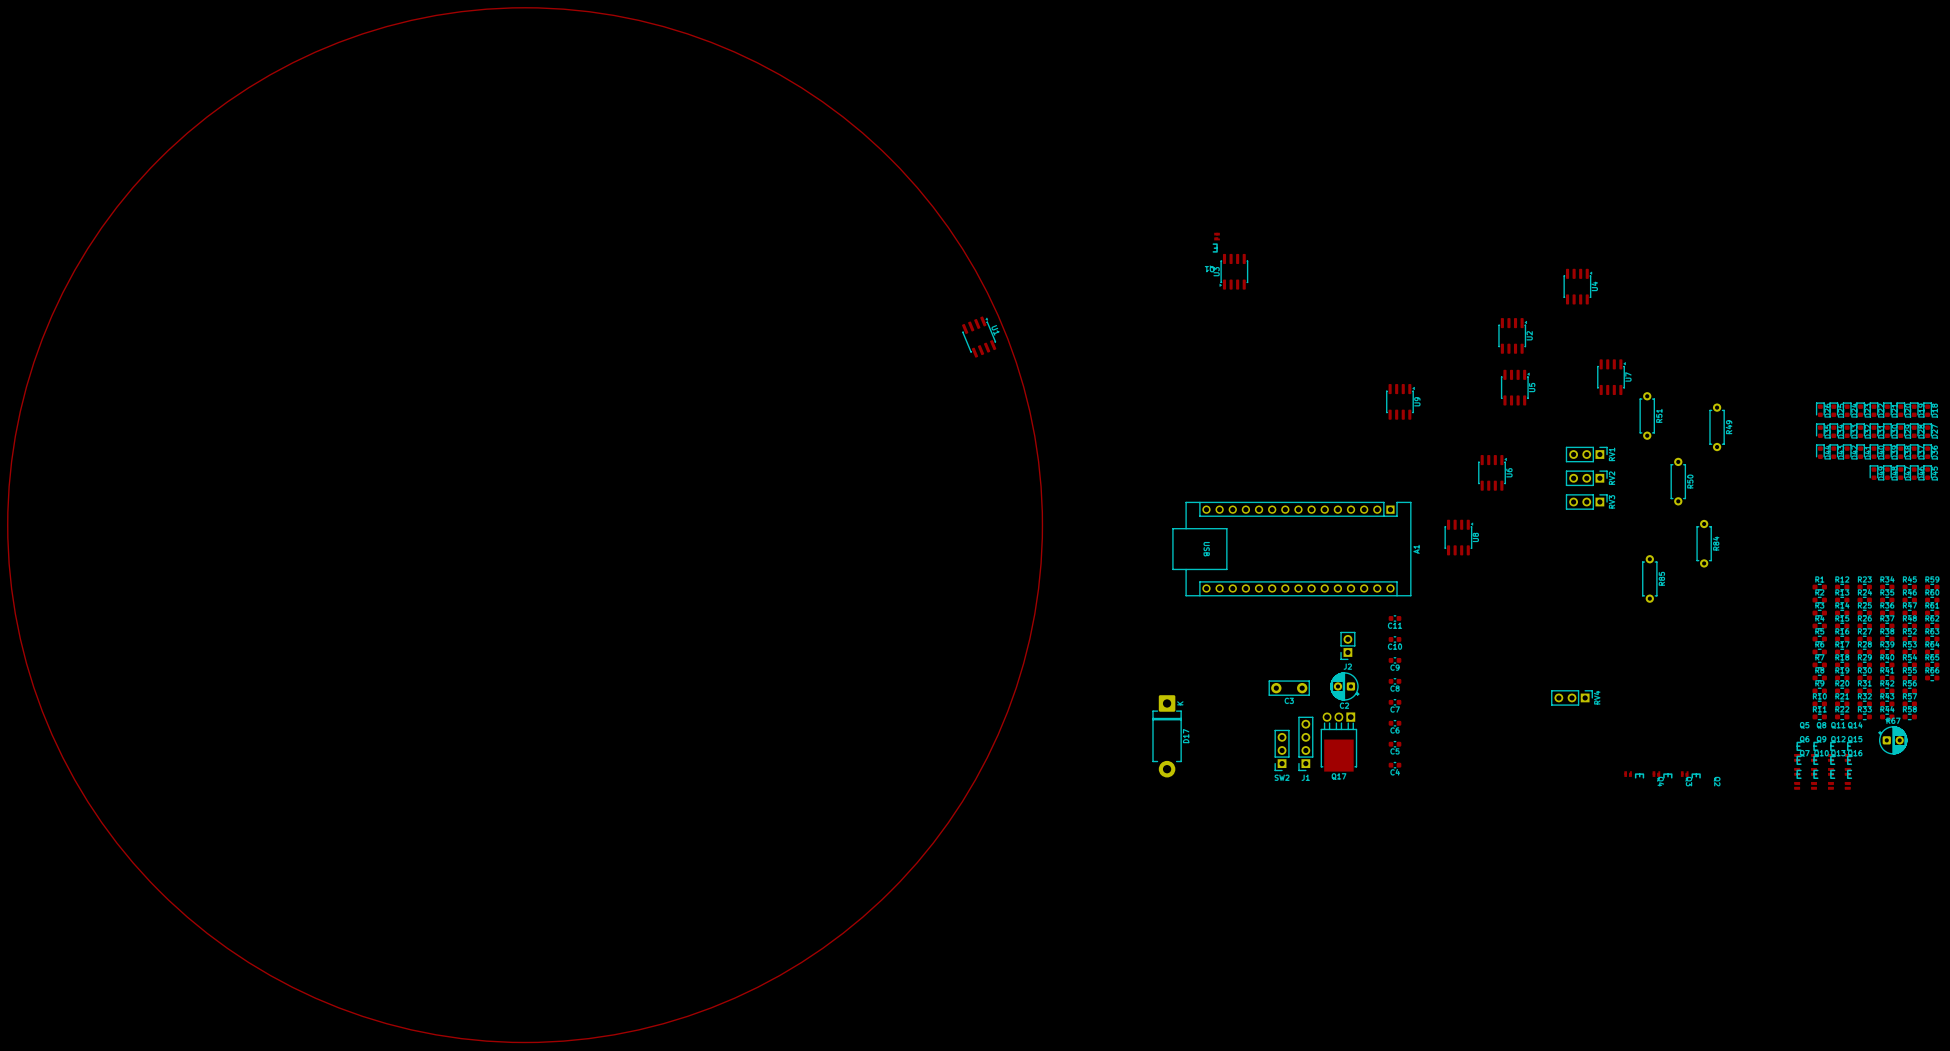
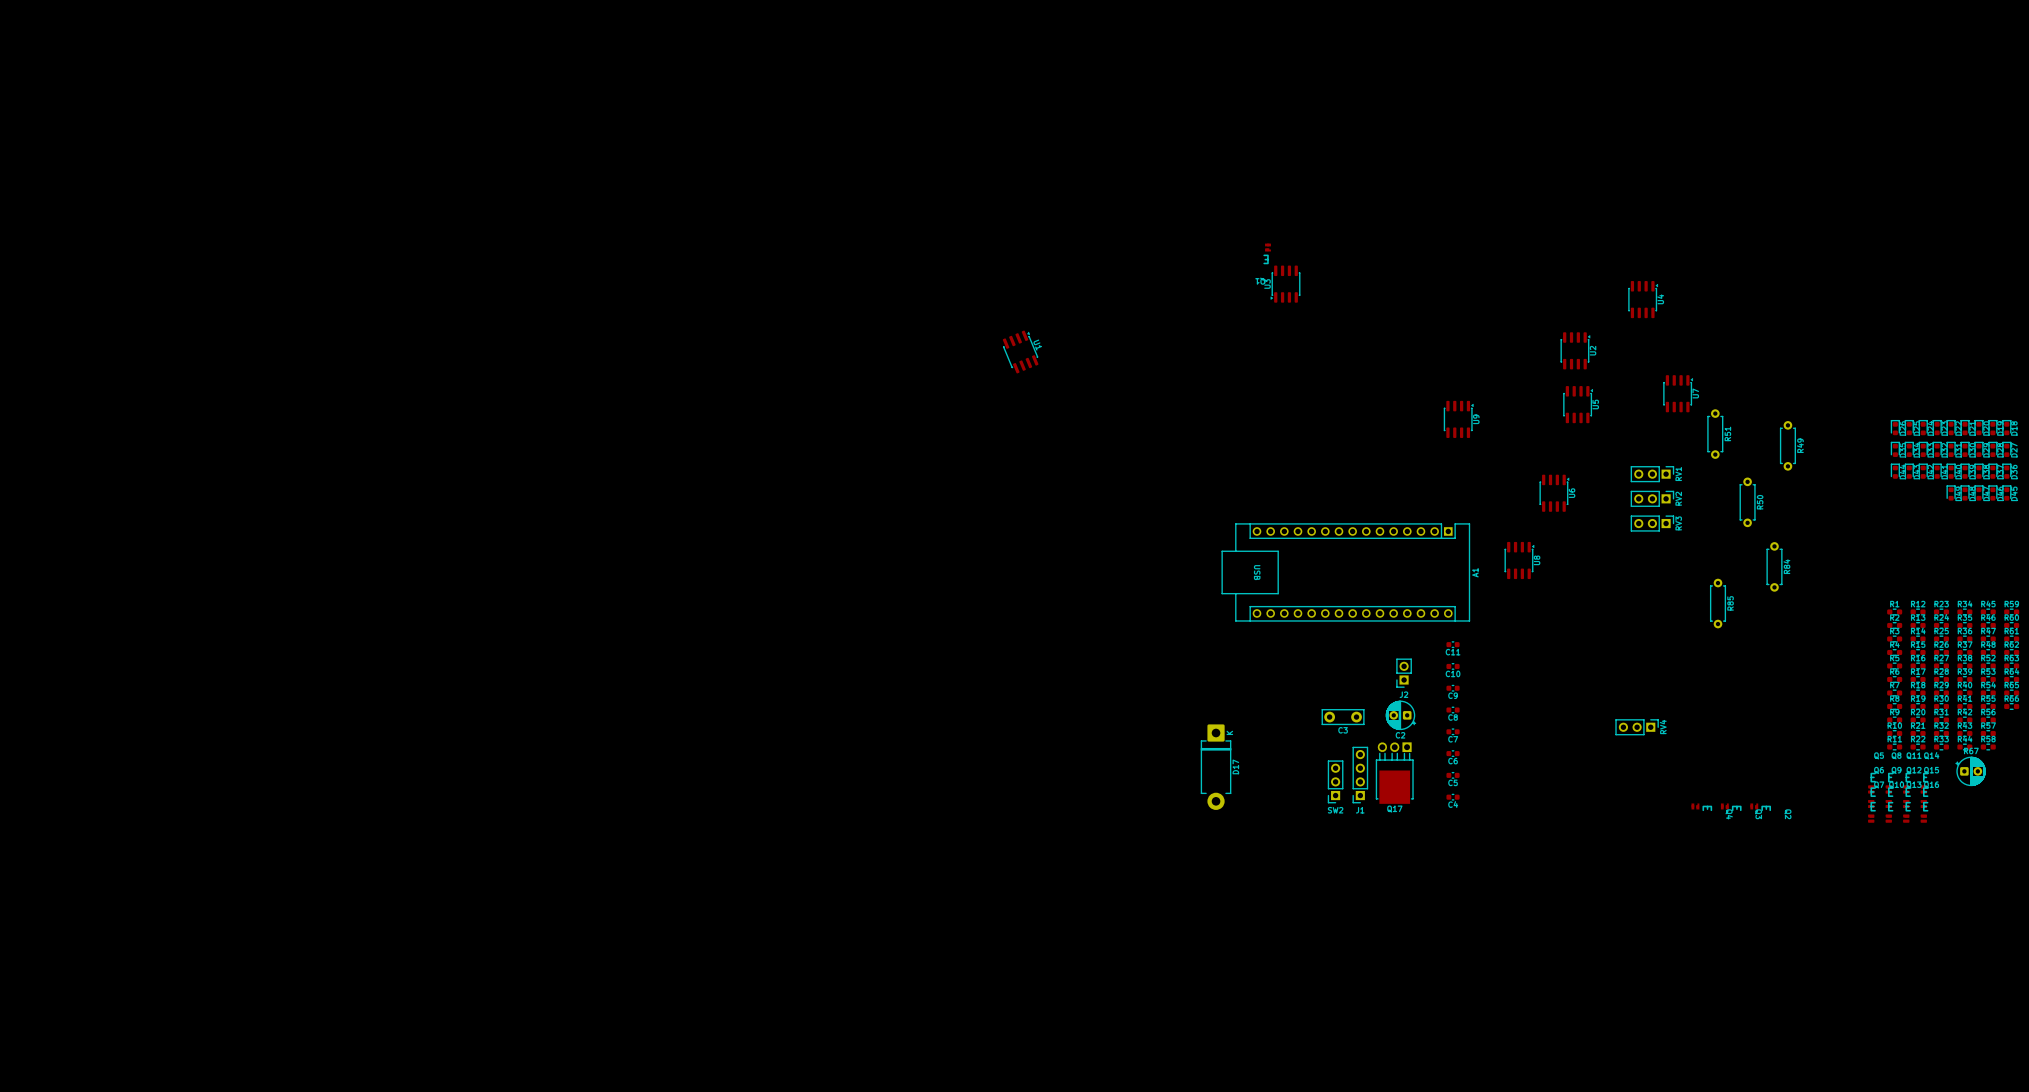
drawing: [7, 7, 1043, 1044] -> none

